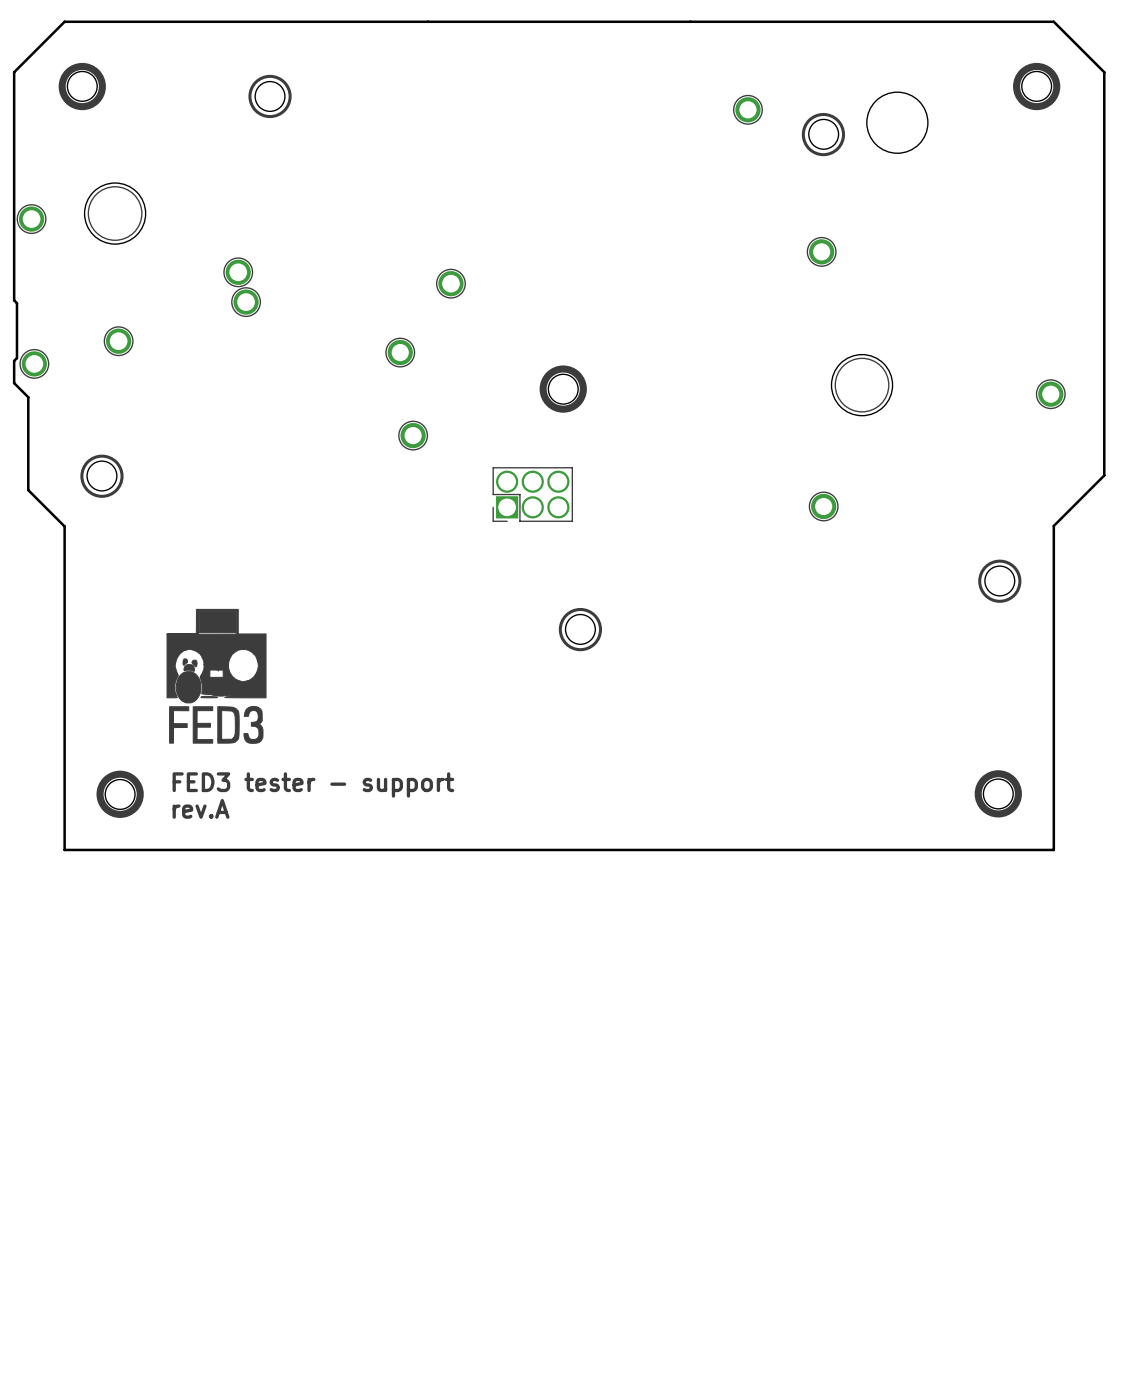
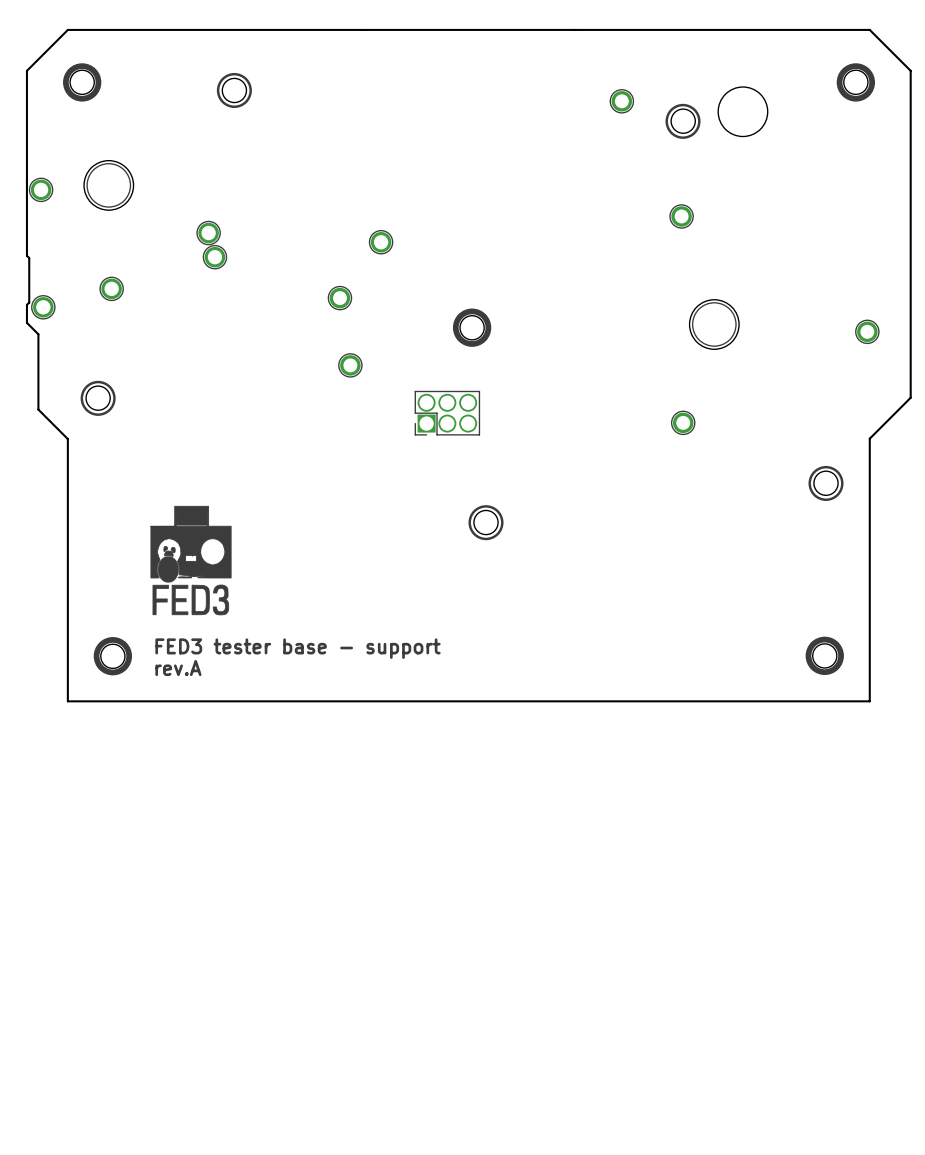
text: FED3 tester - support (313, 784) -> FED3 tester base - support (298, 648)

